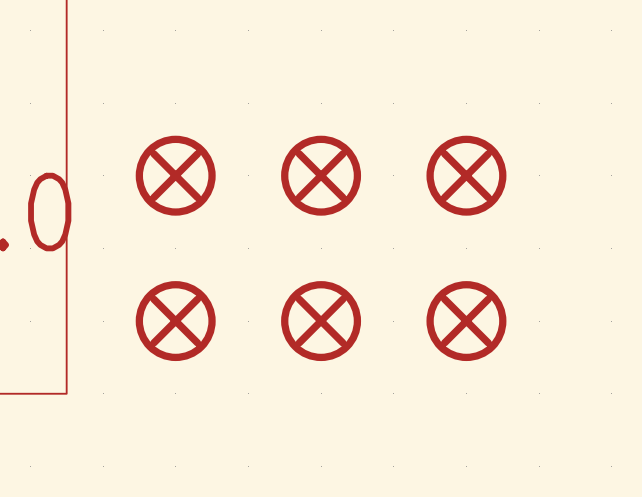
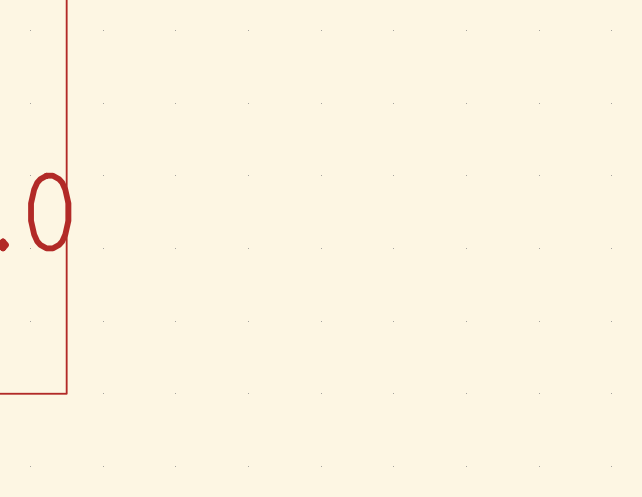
part: (175, 175) -> none
part: (321, 175) -> none
part: (466, 175) -> none
part: (175, 321) -> none
part: (321, 321) -> none
part: (466, 321) -> none

